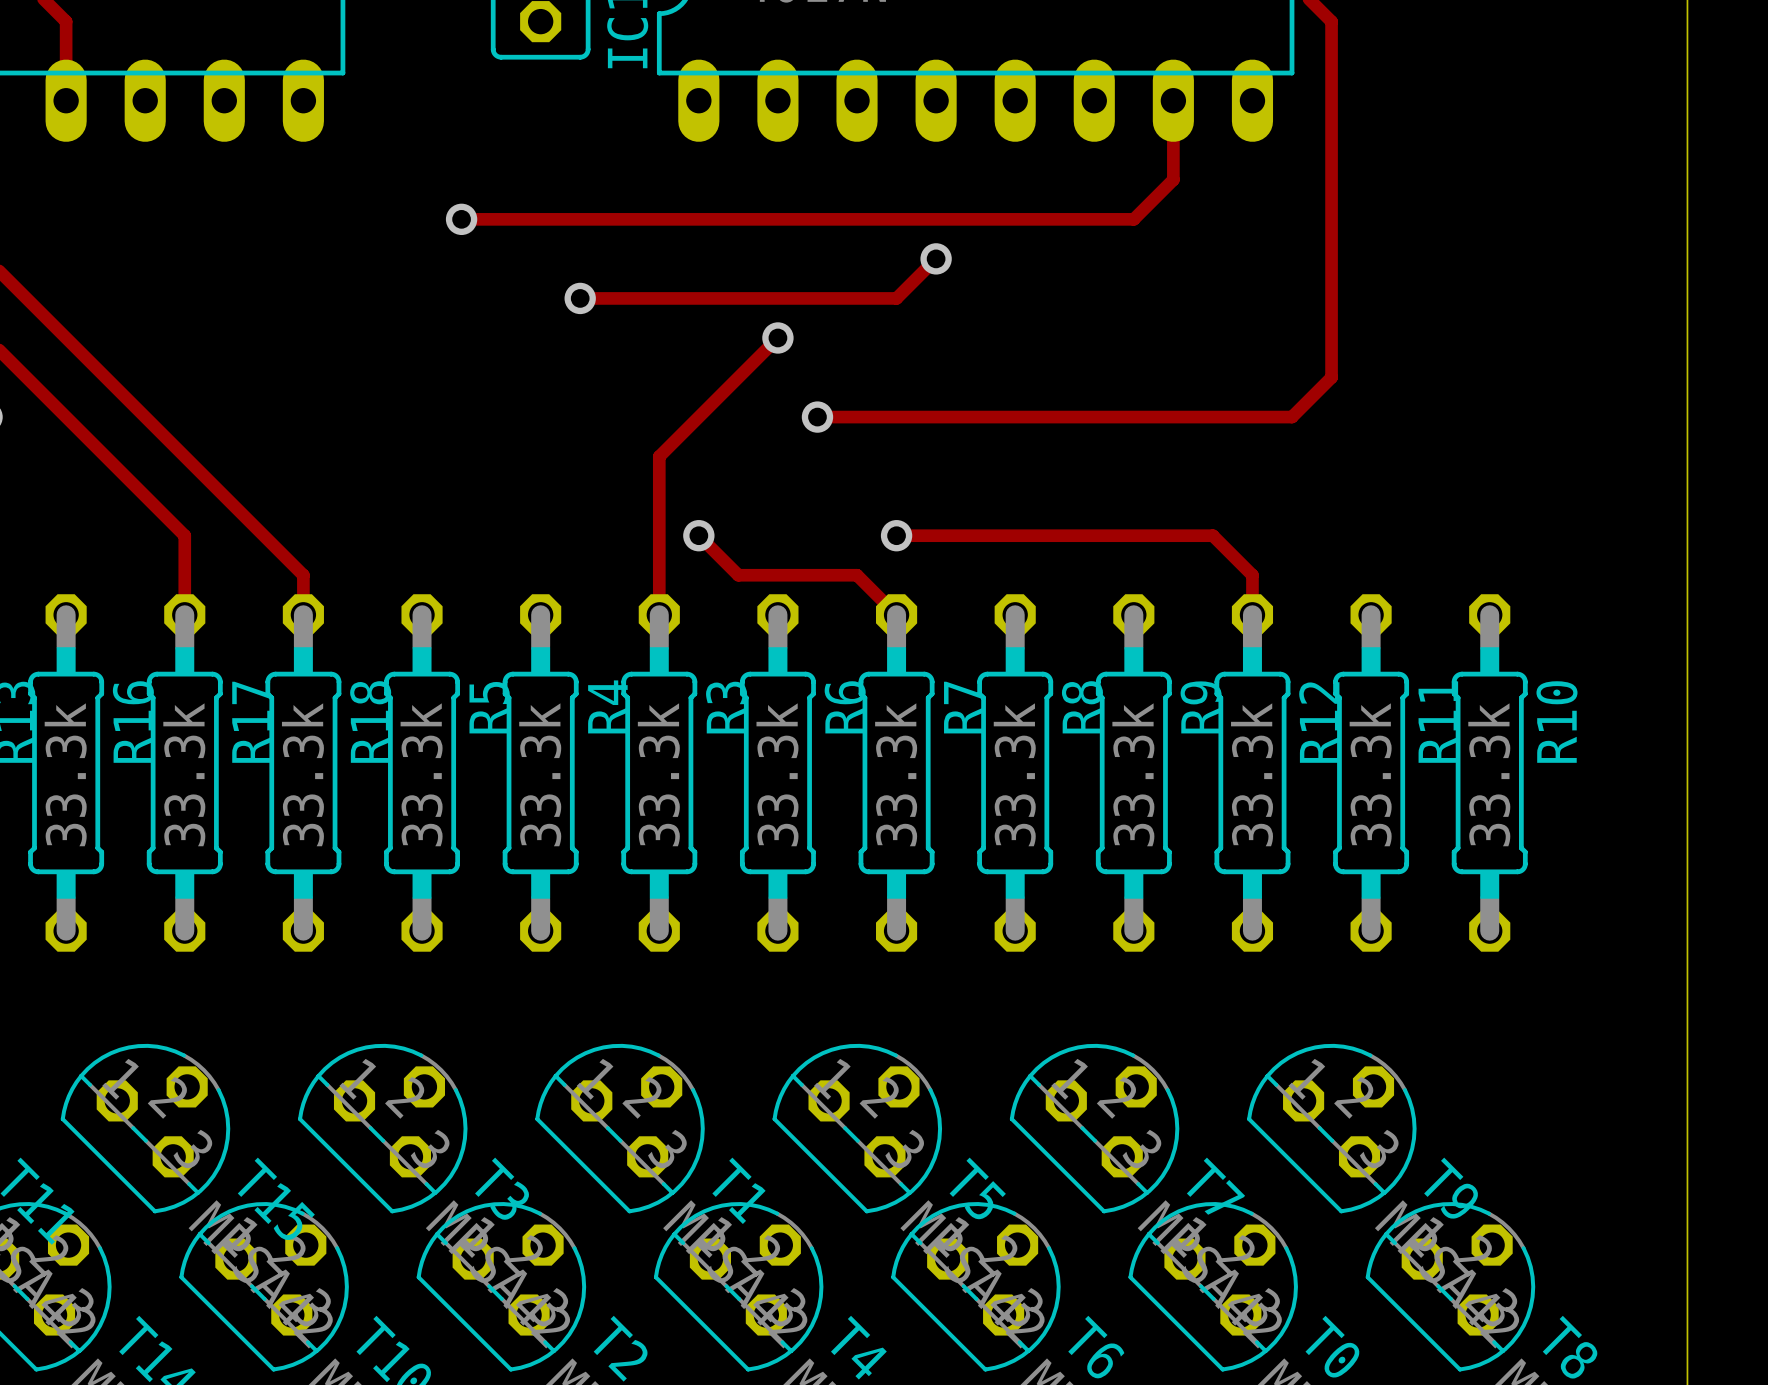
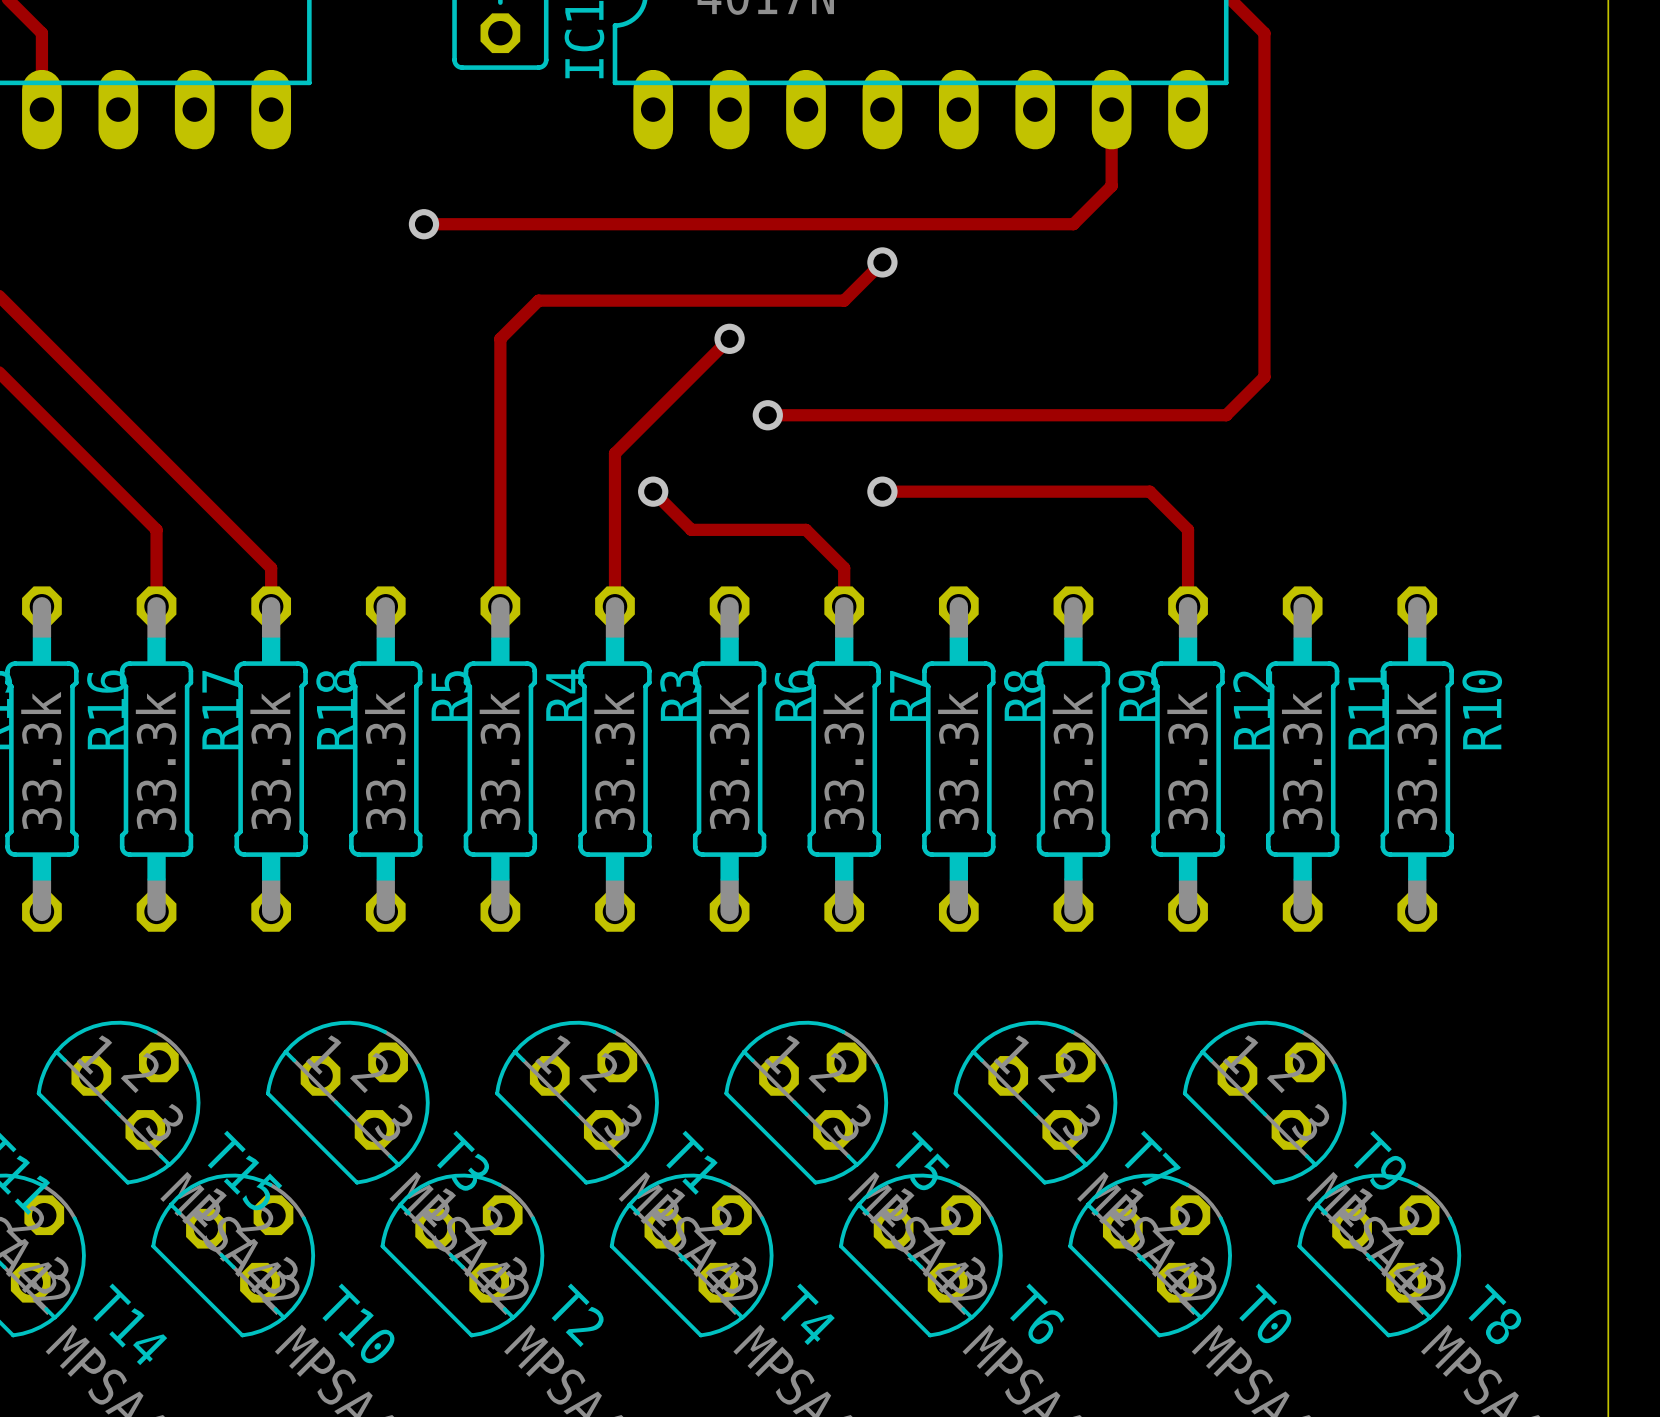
track: none -> (538, 300) (500, 338) (500, 606)
via: (580, 298) -> none
track: (698, 535) (738, 575) (857, 575) (896, 614) -> (653, 491) (691, 529) (806, 529) (844, 568) (844, 606)
via position: (698, 535) -> (653, 491)
track: (896, 535) (1212, 535) (1252, 575) -> (882, 491) (1149, 491) (1188, 529) (1188, 568)
via position: (896, 535) -> (882, 491)

